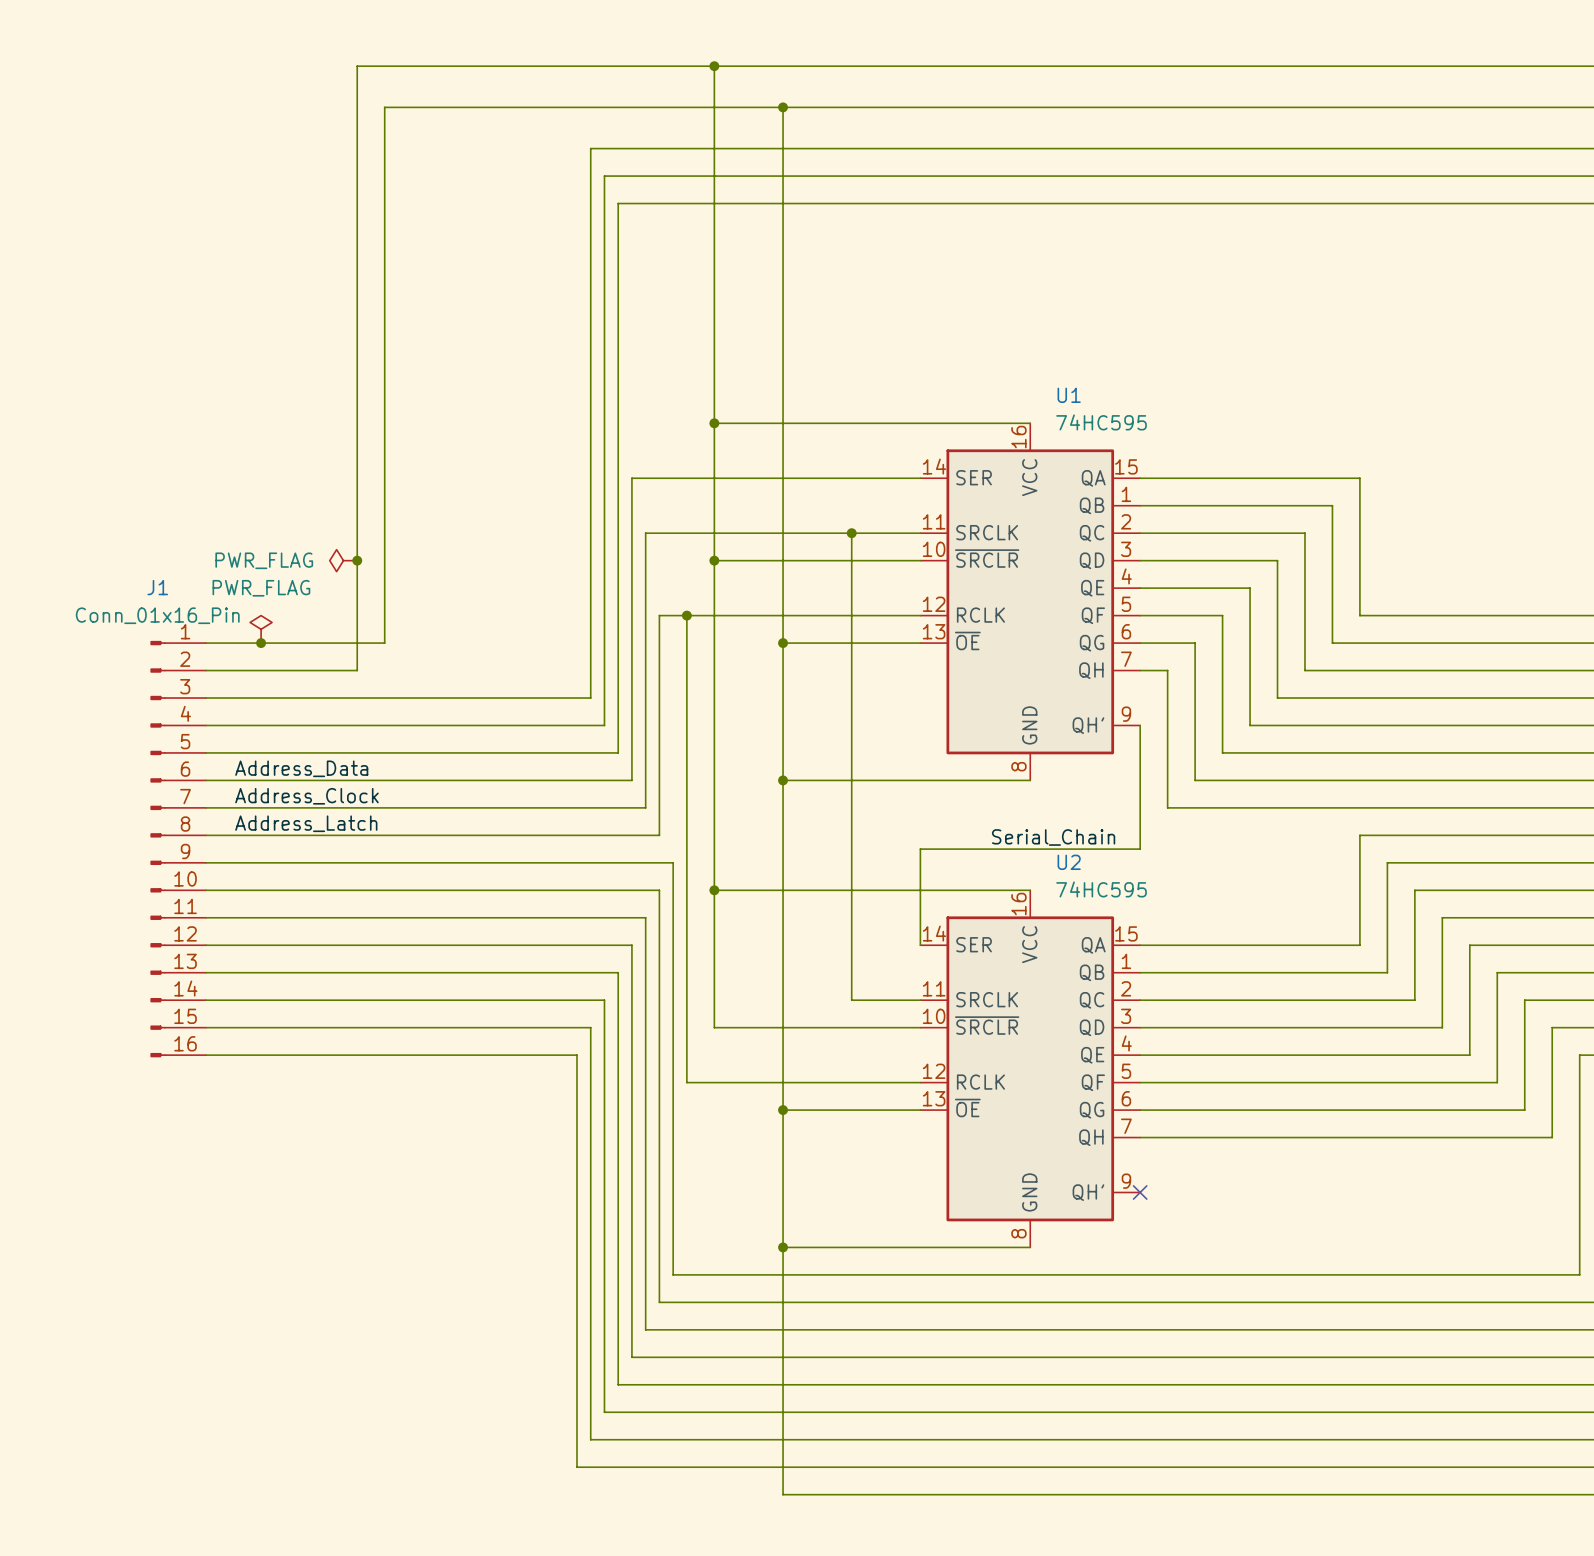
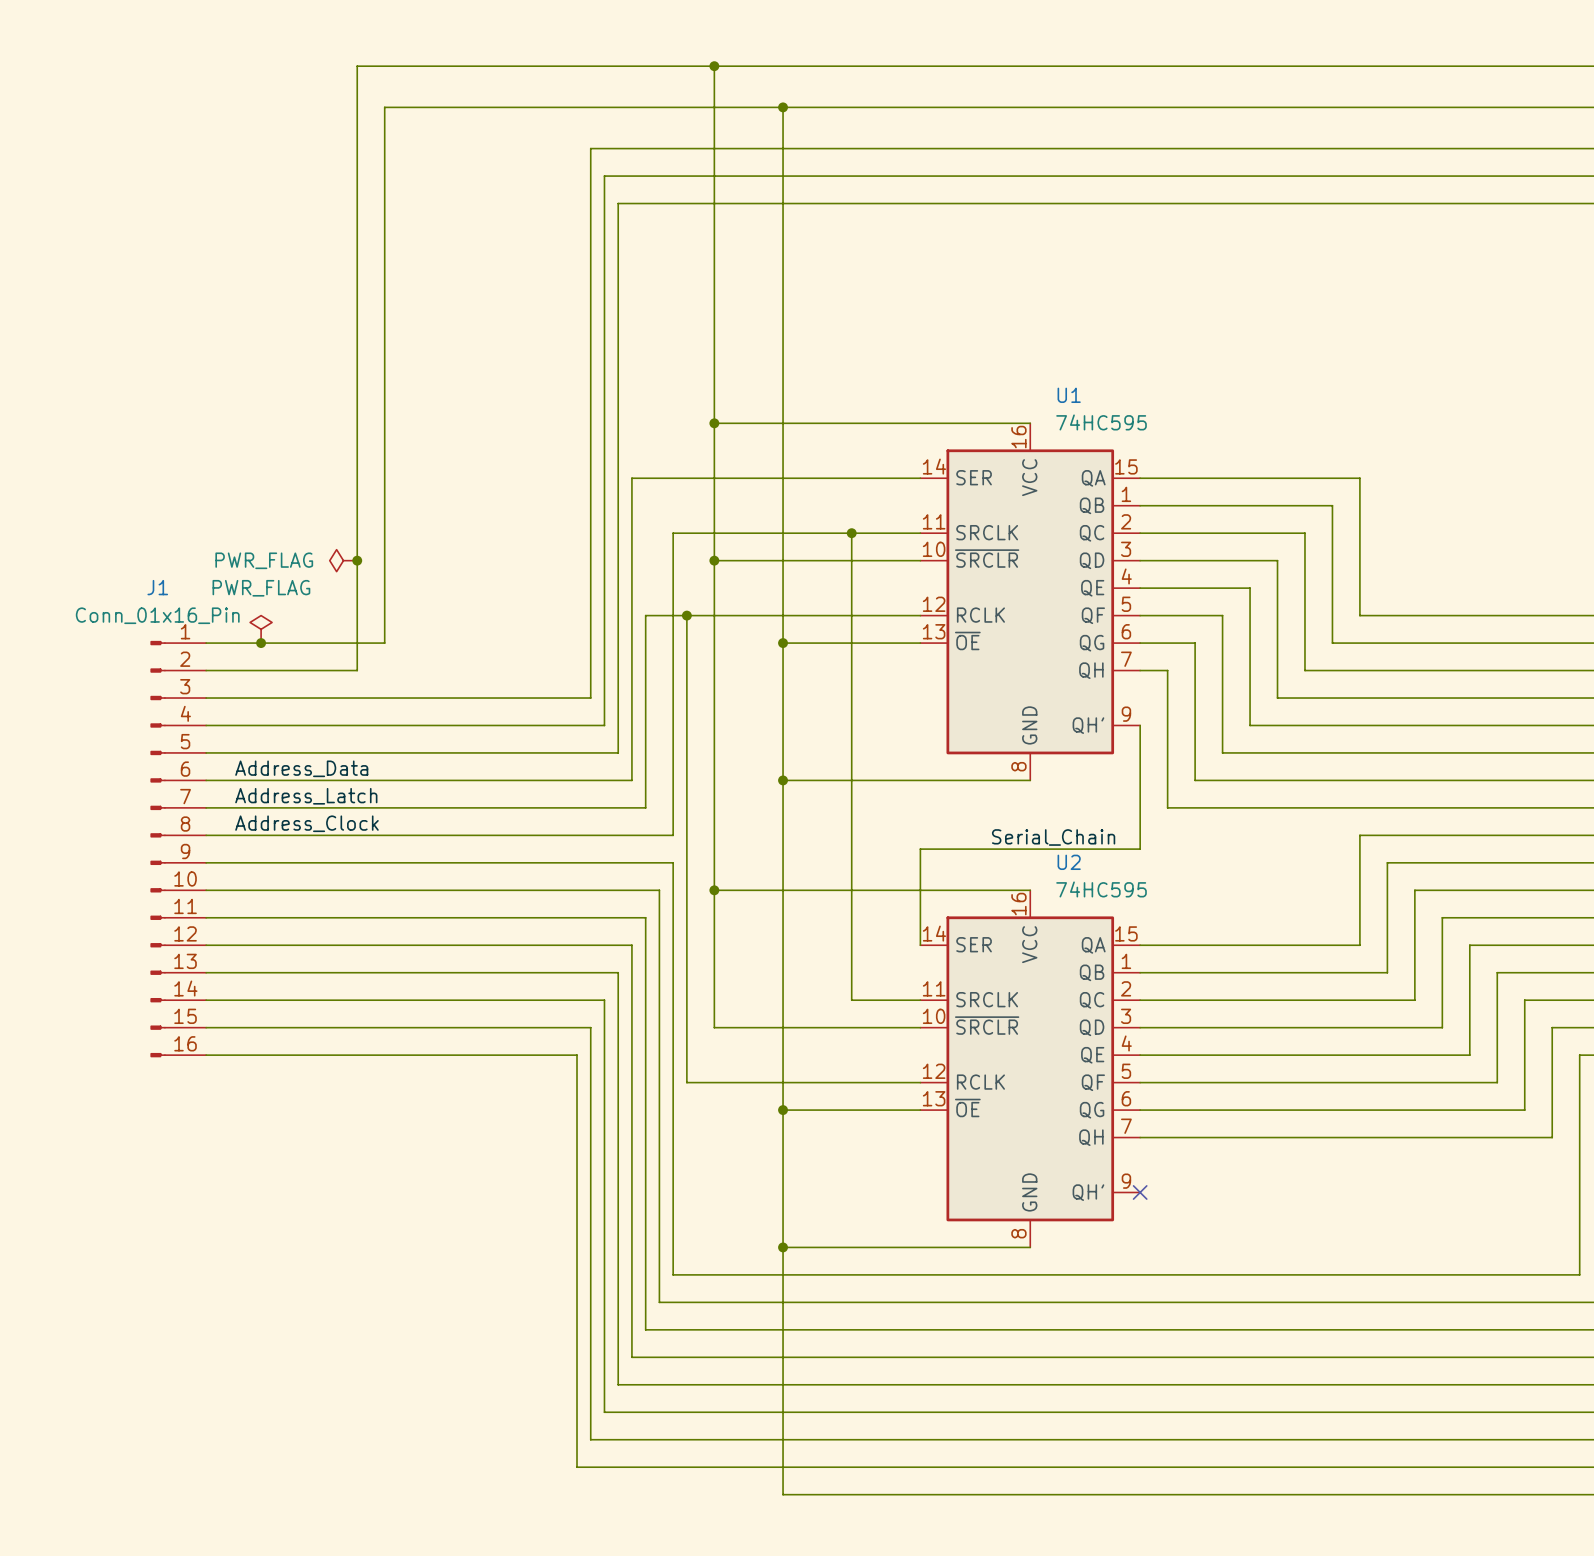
wire: (673, 533) (645, 533) (645, 615) -> (659, 615) (645, 615)
wire: (659, 615) (659, 835) -> (673, 533) (673, 835) (659, 835)
label: Address_Clock (306, 796) -> Address_Latch (306, 796)
label: Address_Latch (306, 823) -> Address_Clock (306, 823)

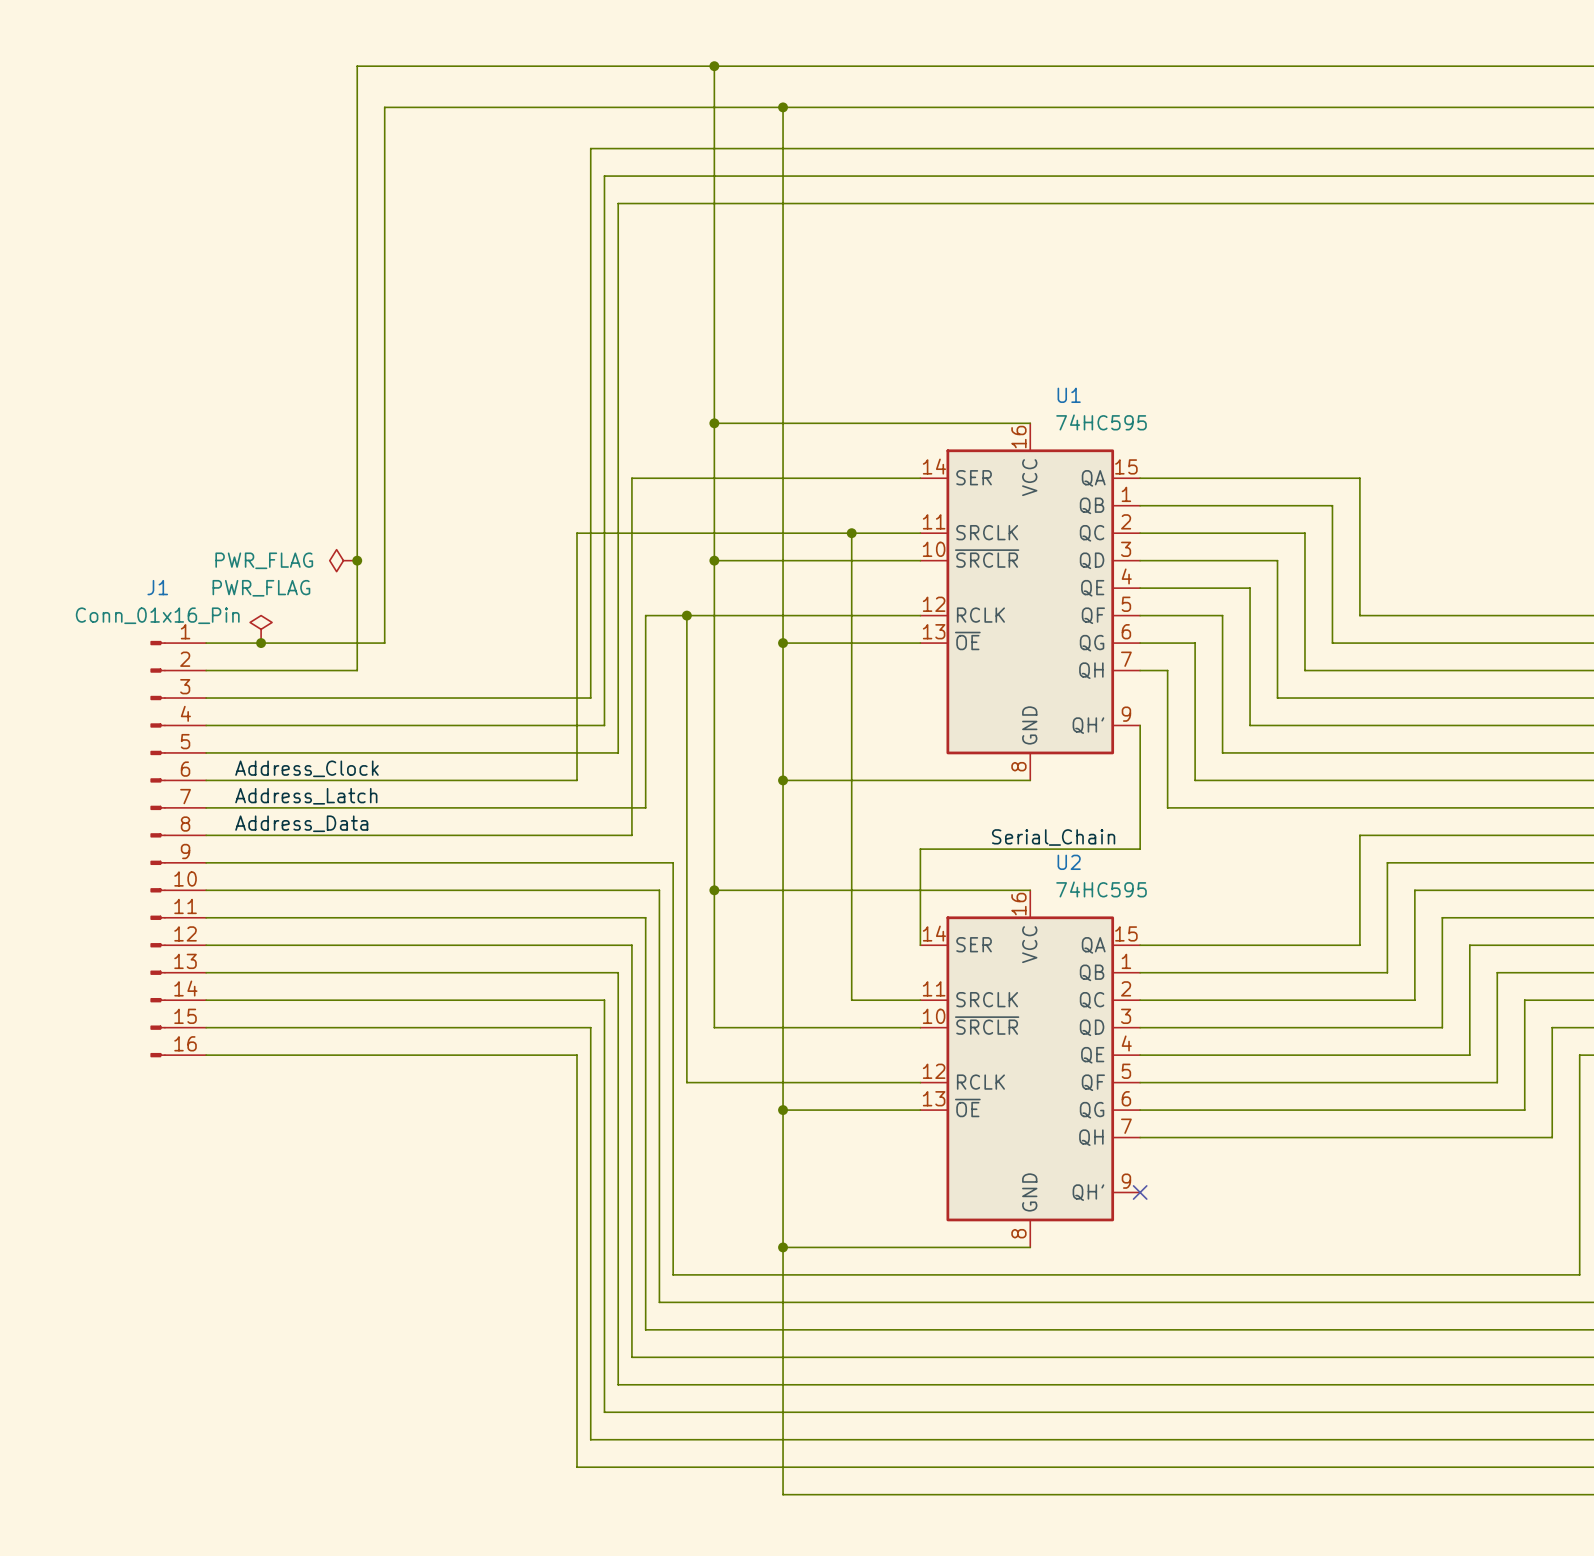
wire: (673, 533) (673, 835) (631, 835) -> (673, 533) (577, 533) (577, 780)
label: Address_Data (301, 768) -> Address_Clock (306, 768)
wire: (577, 780) (631, 780) -> (631, 835) (631, 780)
label: Address_Clock (306, 823) -> Address_Data (301, 823)

